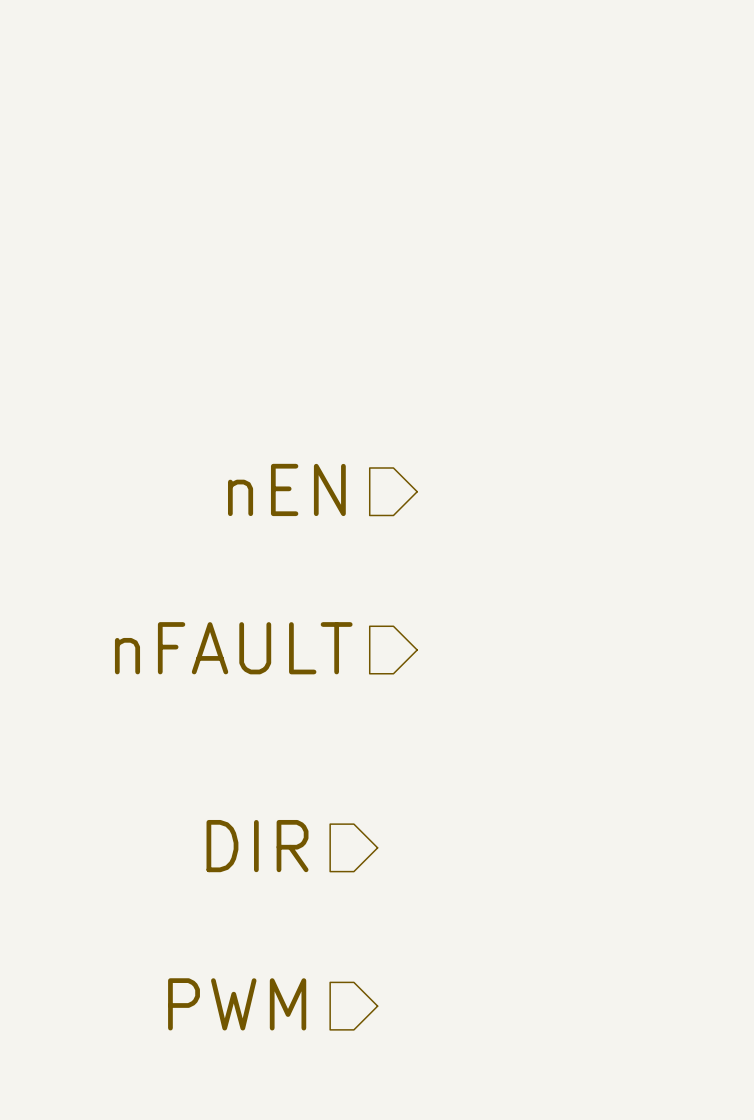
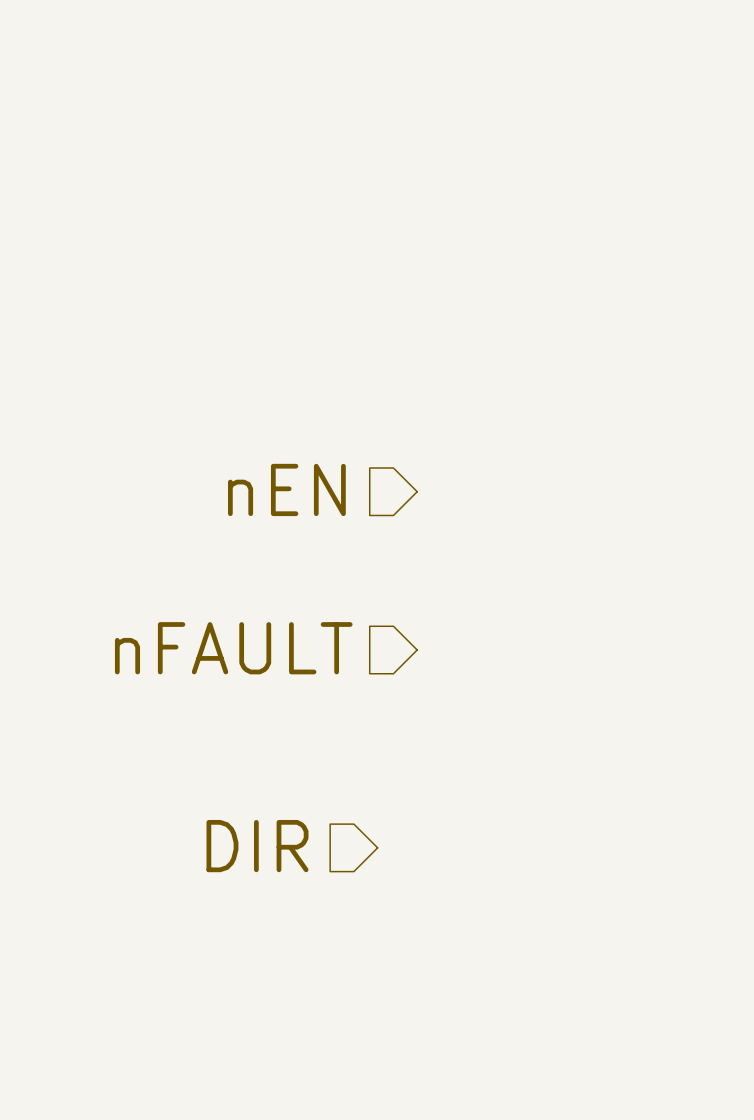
hierarchical label: PWM (237, 1004) -> none

